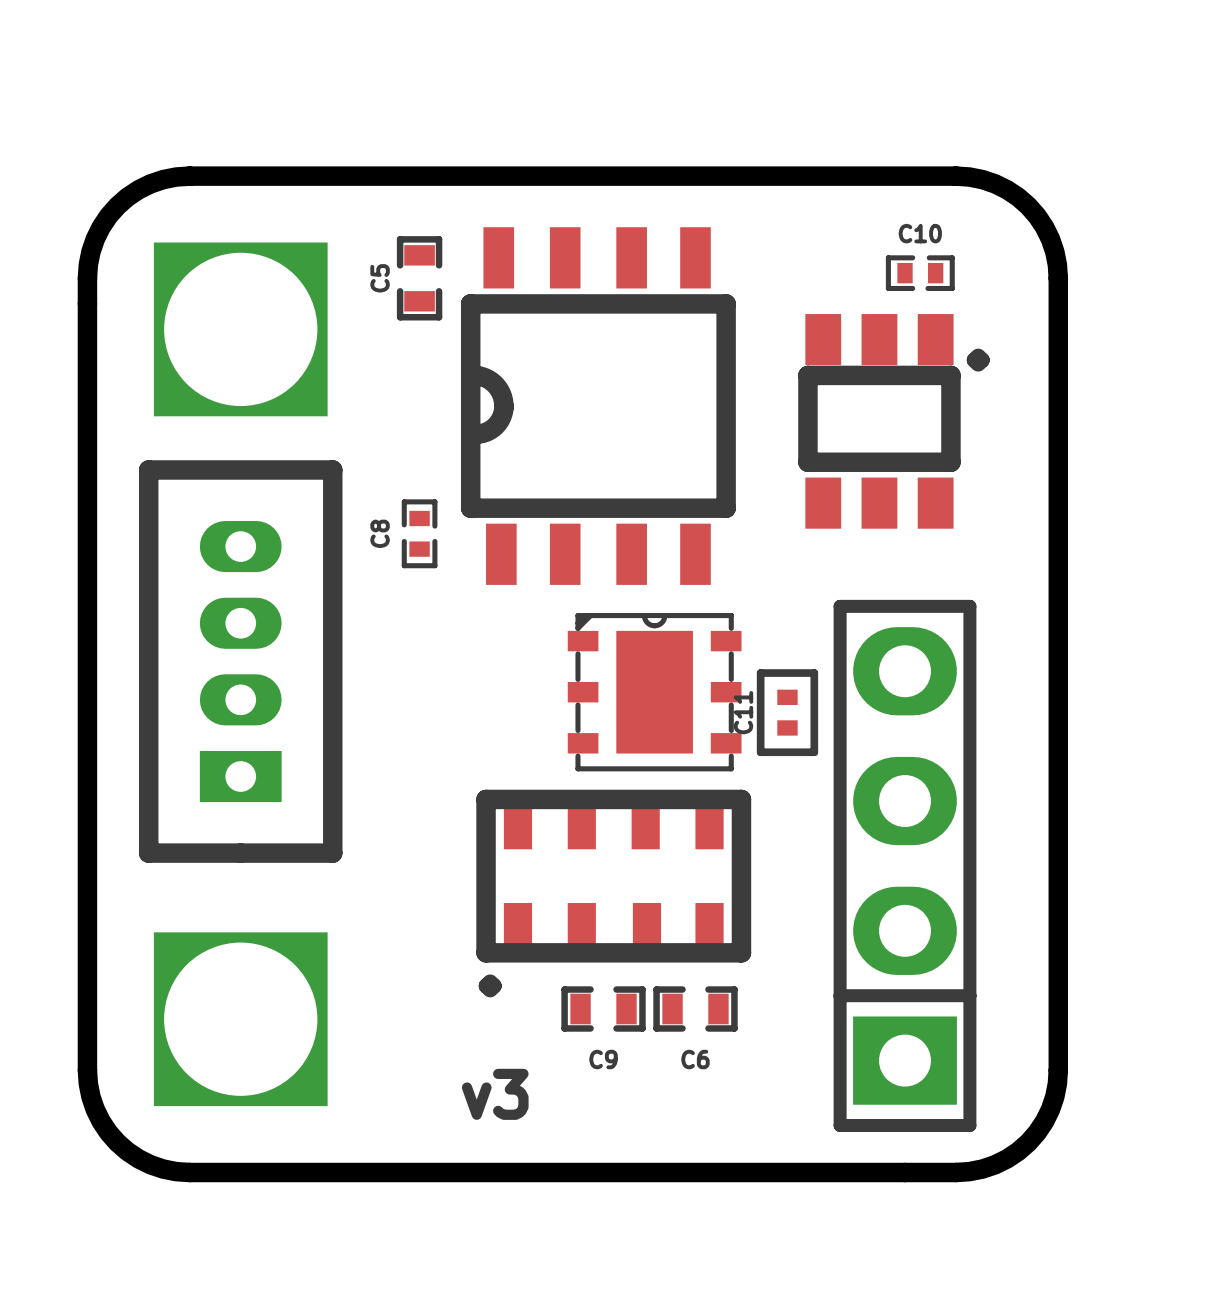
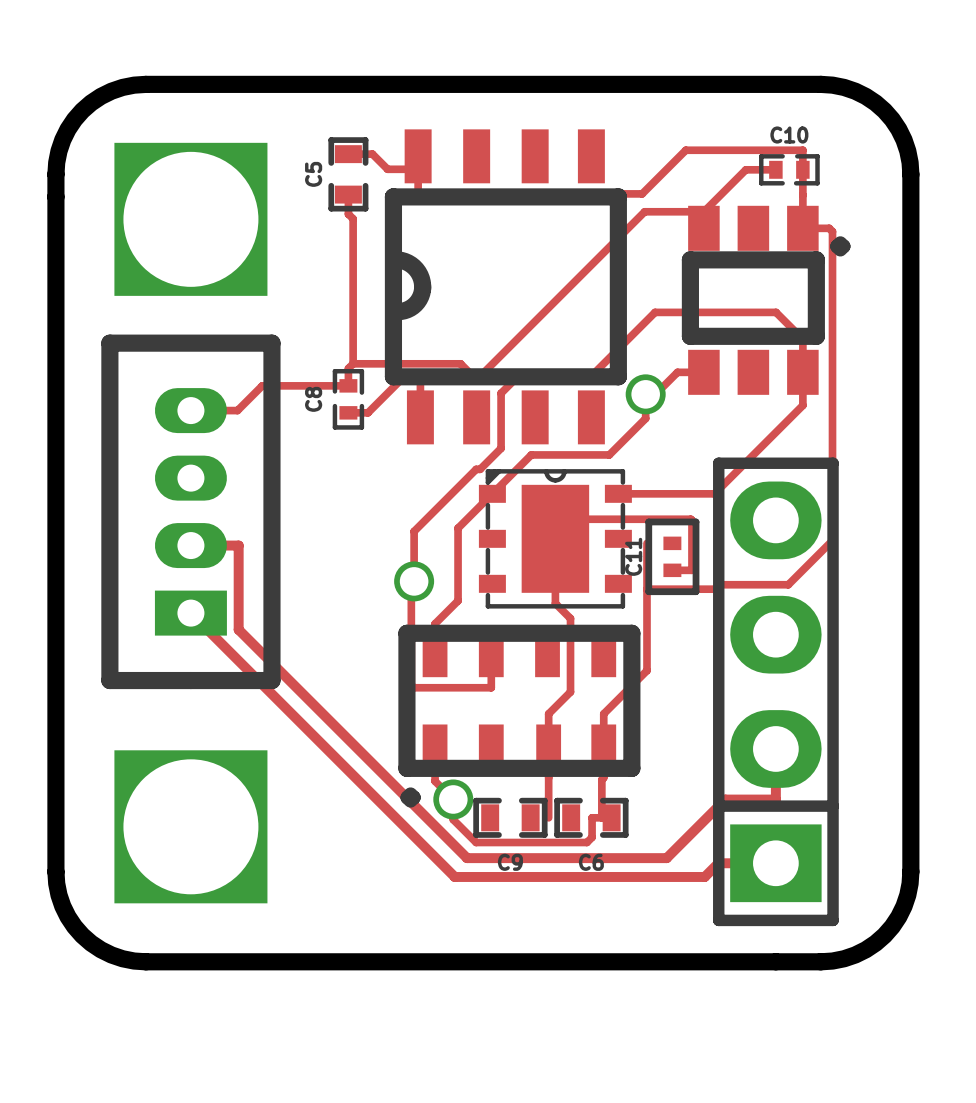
track: none -> (348, 154) (372, 154) (387, 169) (418, 169)
track: none -> (418, 156) (418, 193) (642, 193) (685, 150) (802, 150) (802, 228) (829, 228) (832, 231) (832, 540) (788, 584) (719, 584) (715, 589) (647, 589)
track: none -> (775, 169) (745, 169) (703, 211)
track: none -> (348, 194) (348, 214) (353, 218) (353, 363)
track: none -> (703, 211) (644, 211) (476, 379) (460, 363) (353, 363)
track: none -> (353, 363) (348, 368) (348, 385) (262, 385) (237, 410) (190, 410)
track: none -> (703, 372) (677, 372) (655, 394) (645, 394) (645, 418) (609, 454) (531, 454) (458, 528) (458, 600) (435, 623) (435, 655)
via: none -> (645, 394)
track: none -> (348, 412) (367, 412) (401, 379) (420, 379) (420, 417)
track: none -> (618, 493) (714, 493) (802, 405) (802, 339) (776, 312) (655, 312) (591, 376) (518, 376) (501, 393) (501, 448) (480, 469) (476, 469) (414, 531) (414, 581) (411, 584) (411, 685) (413, 687) (491, 687) (491, 655)
track: none -> (647, 543) (647, 670) (603, 713) (601, 817)
track: none -> (190, 545) (238, 545) (238, 629) (467, 858) (666, 858) (725, 799) (775, 799) (775, 748)
track: none -> (672, 570) (691, 570) (690, 519) (575, 519) (555, 538) (555, 603) (570, 618) (570, 692) (548, 713) (548, 817)
via: none -> (414, 581)
track: none -> (190, 613) (454, 876) (704, 876) (718, 863) (775, 863)
track: none -> (435, 745) (435, 781) (453, 799) (453, 819) (476, 842) (586, 842) (592, 837) (592, 817) (611, 817)
via: none -> (453, 799)
text: v3 (495, 1094) -> none

